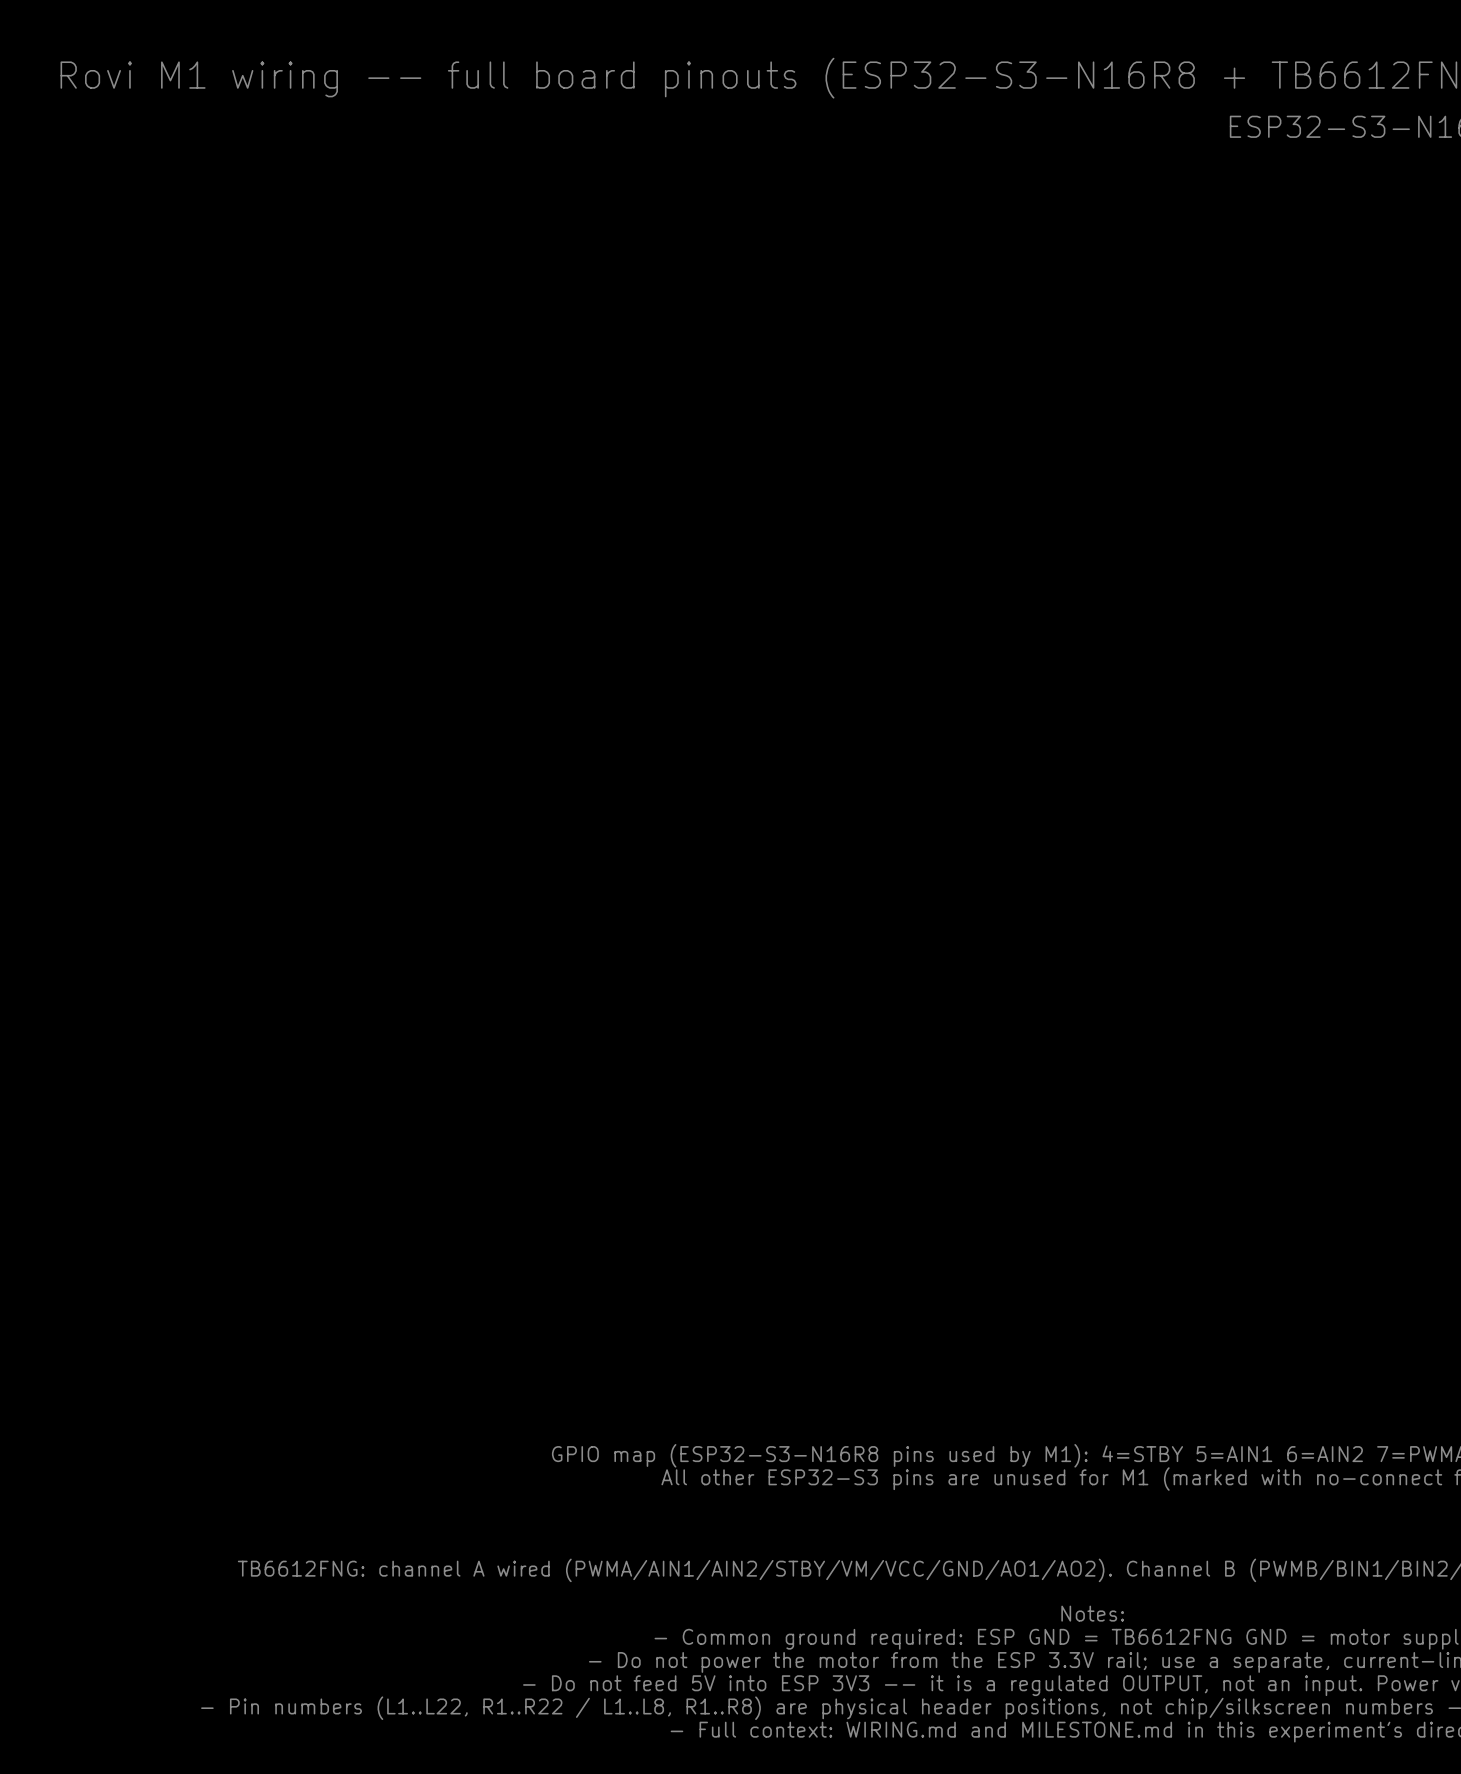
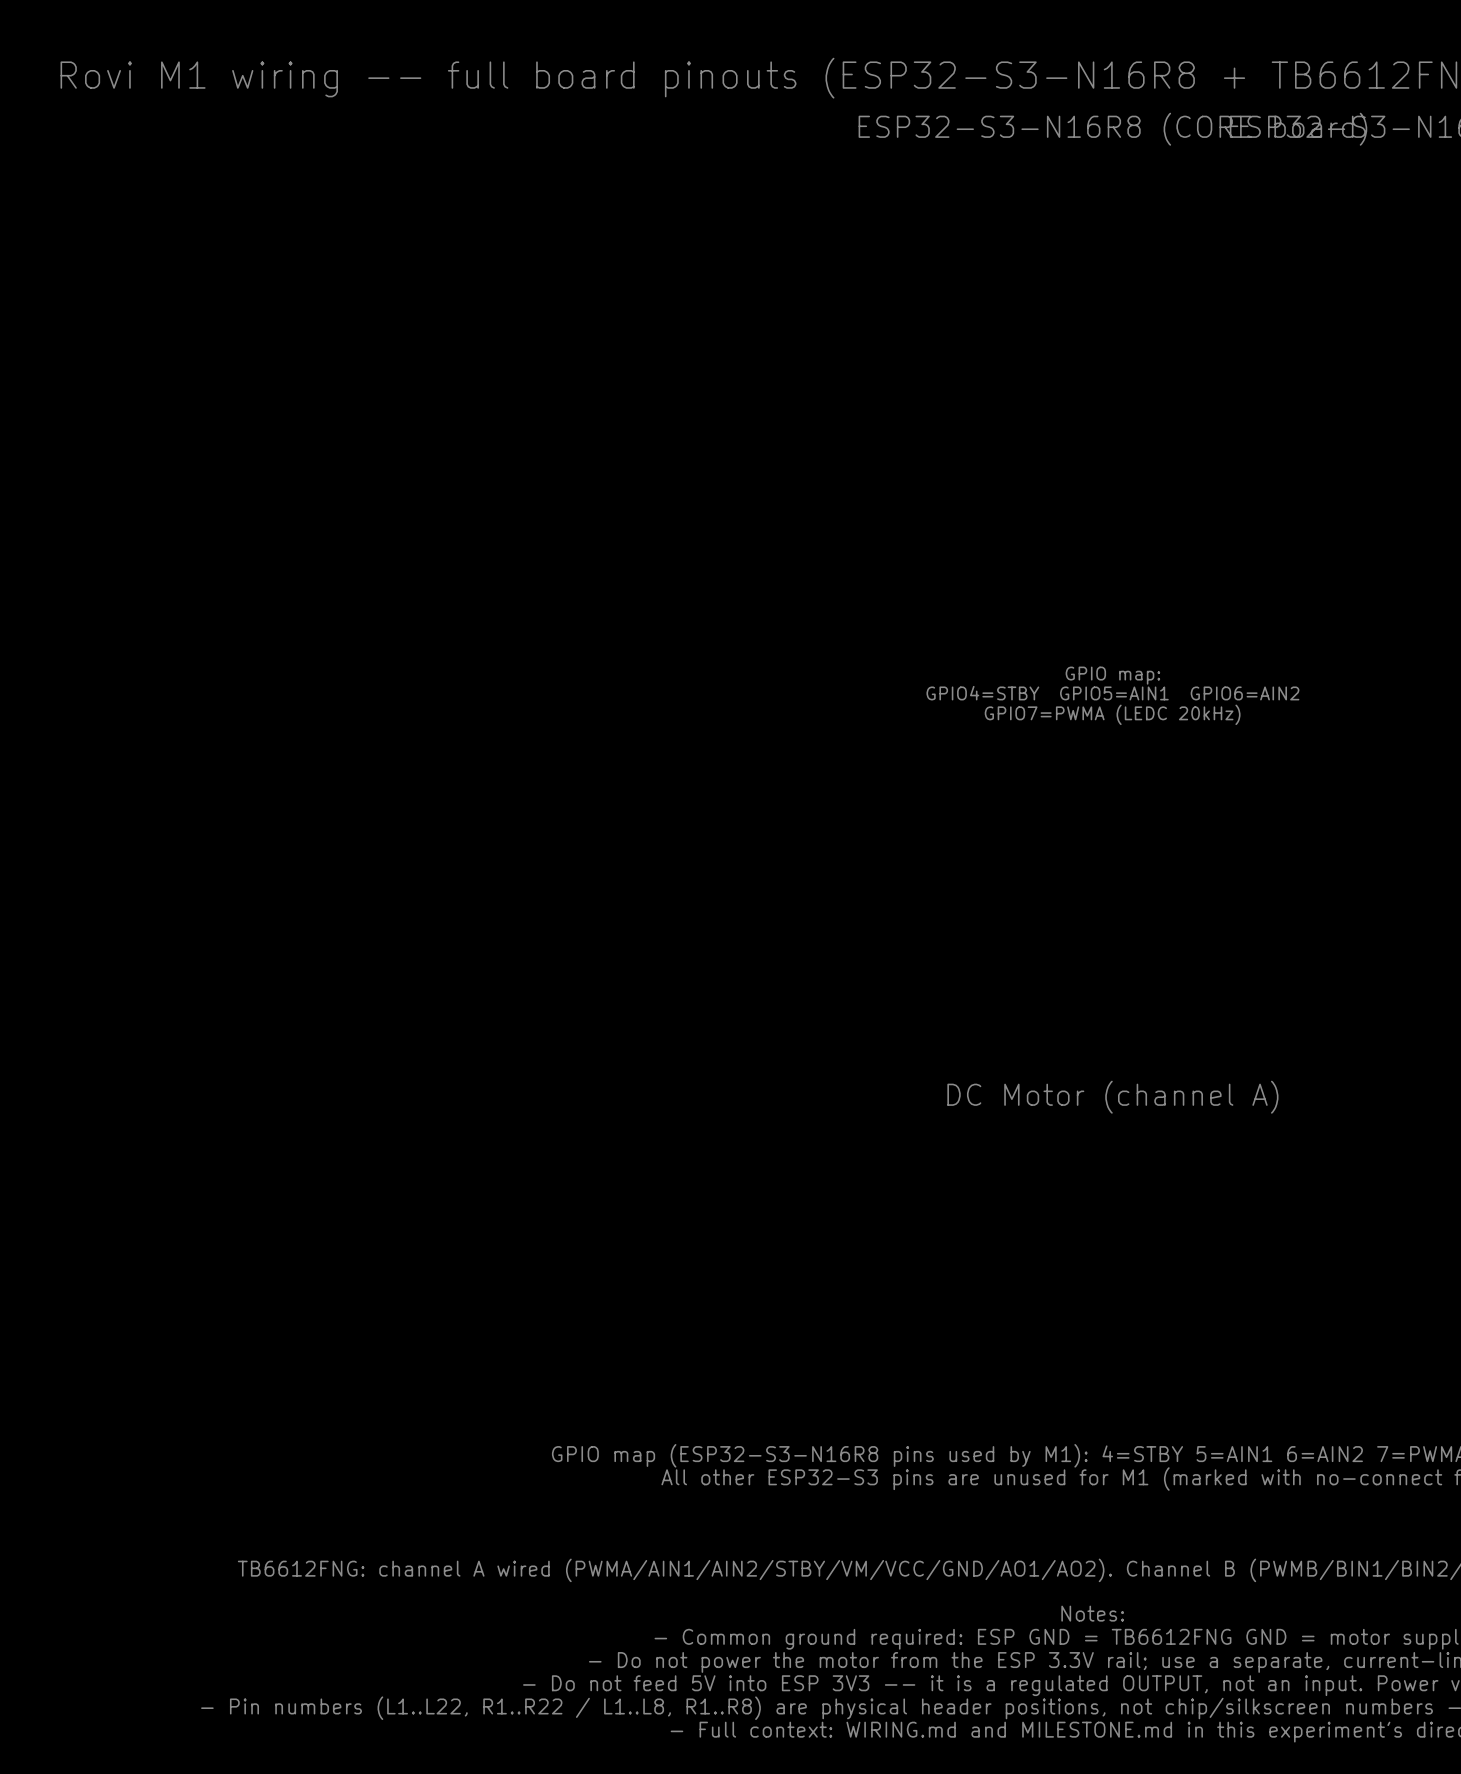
text: none -> ESP32-S3-N16R8 (CORE board) (1112, 129)
text: none -> GPIO map: (1112, 675)
text: none -> GPIO4=STBY GPIO5=AIN1 GPIO6=AIN2 (1112, 693)
text: none -> GPIO7=PWMA (LEDC 20kHz) (1112, 714)
text: none -> DC Motor (channel A) (1112, 1097)

